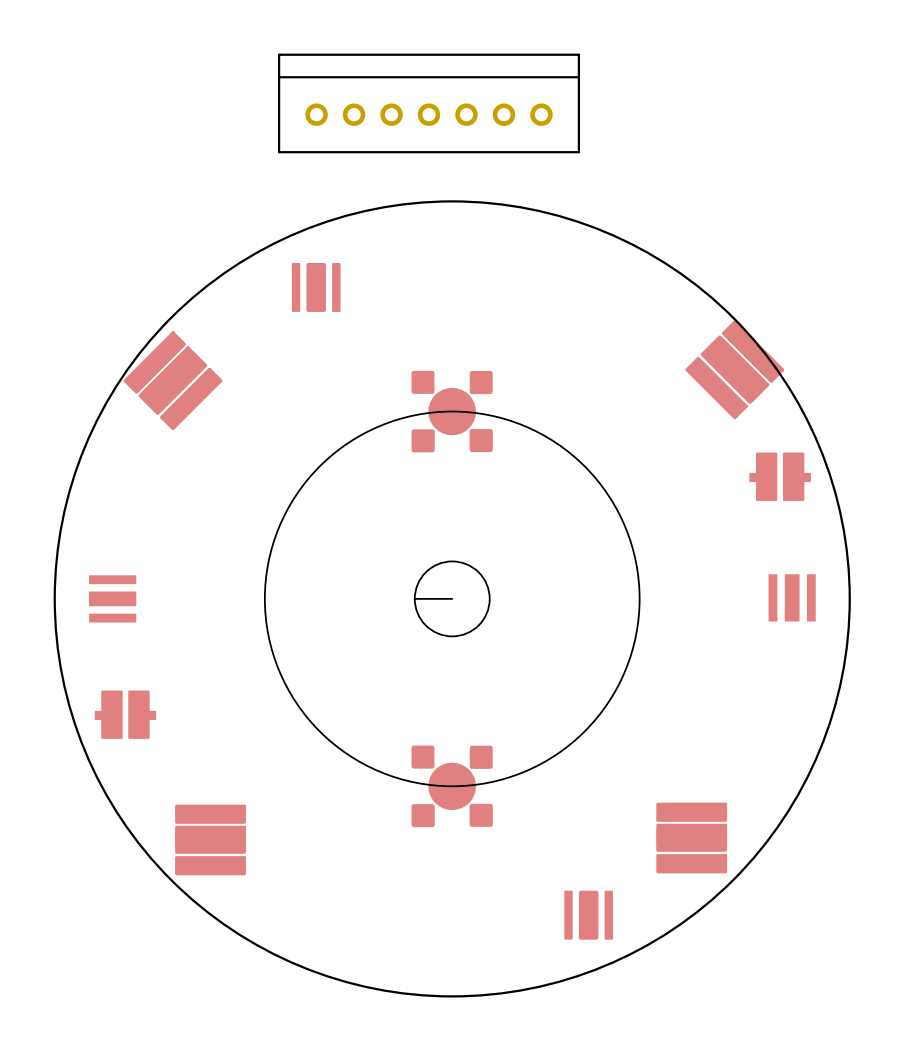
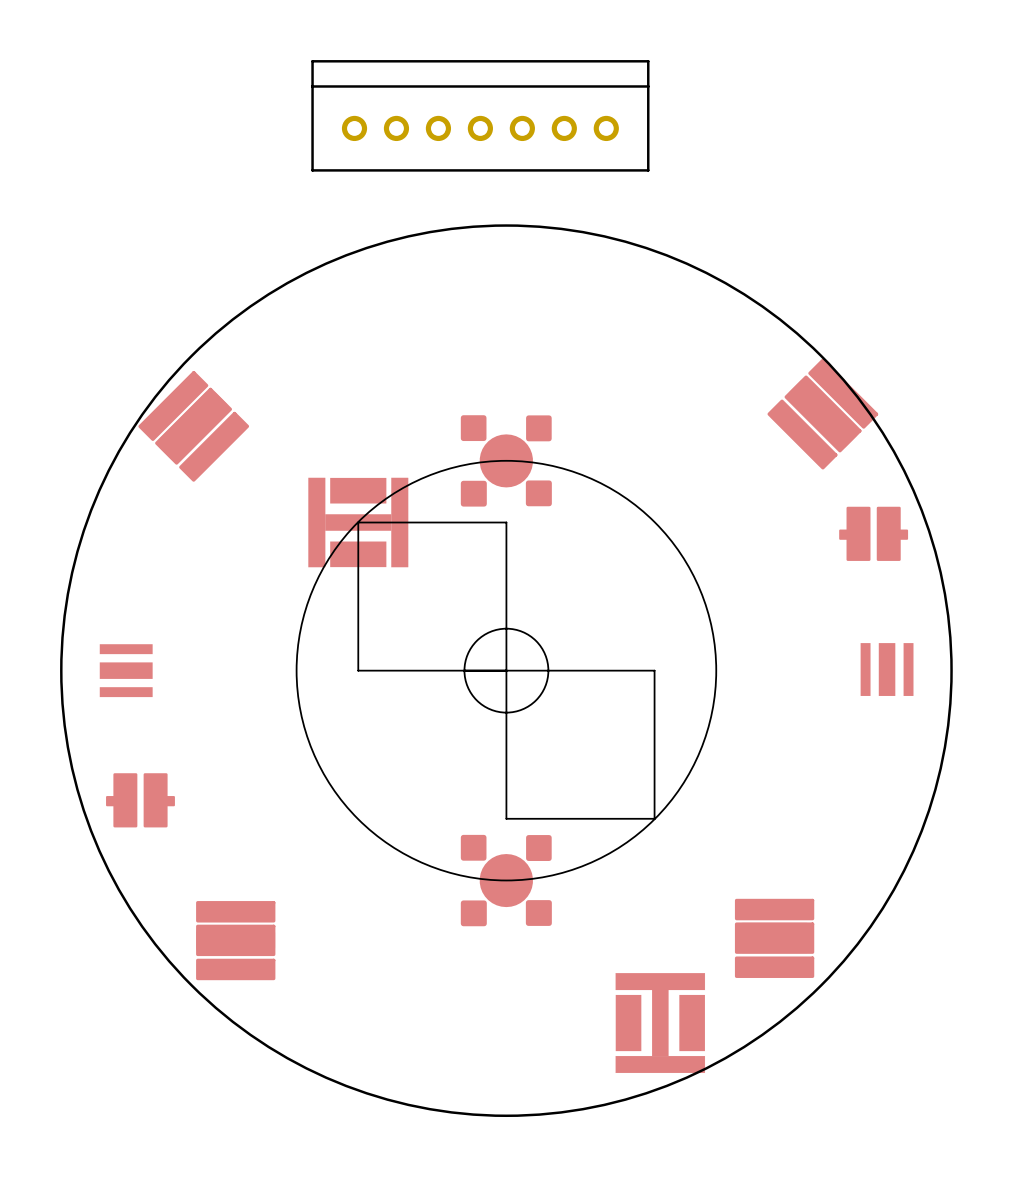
part: (316, 287) -> none
part: none -> (358, 522)
board edge: none -> (506, 670) (654, 670) (654, 818) (506, 818) (506, 522) (358, 522) (358, 670) (464, 670)
part footprint: [564, 890, 614, 940] -> [615, 973, 706, 1074]

